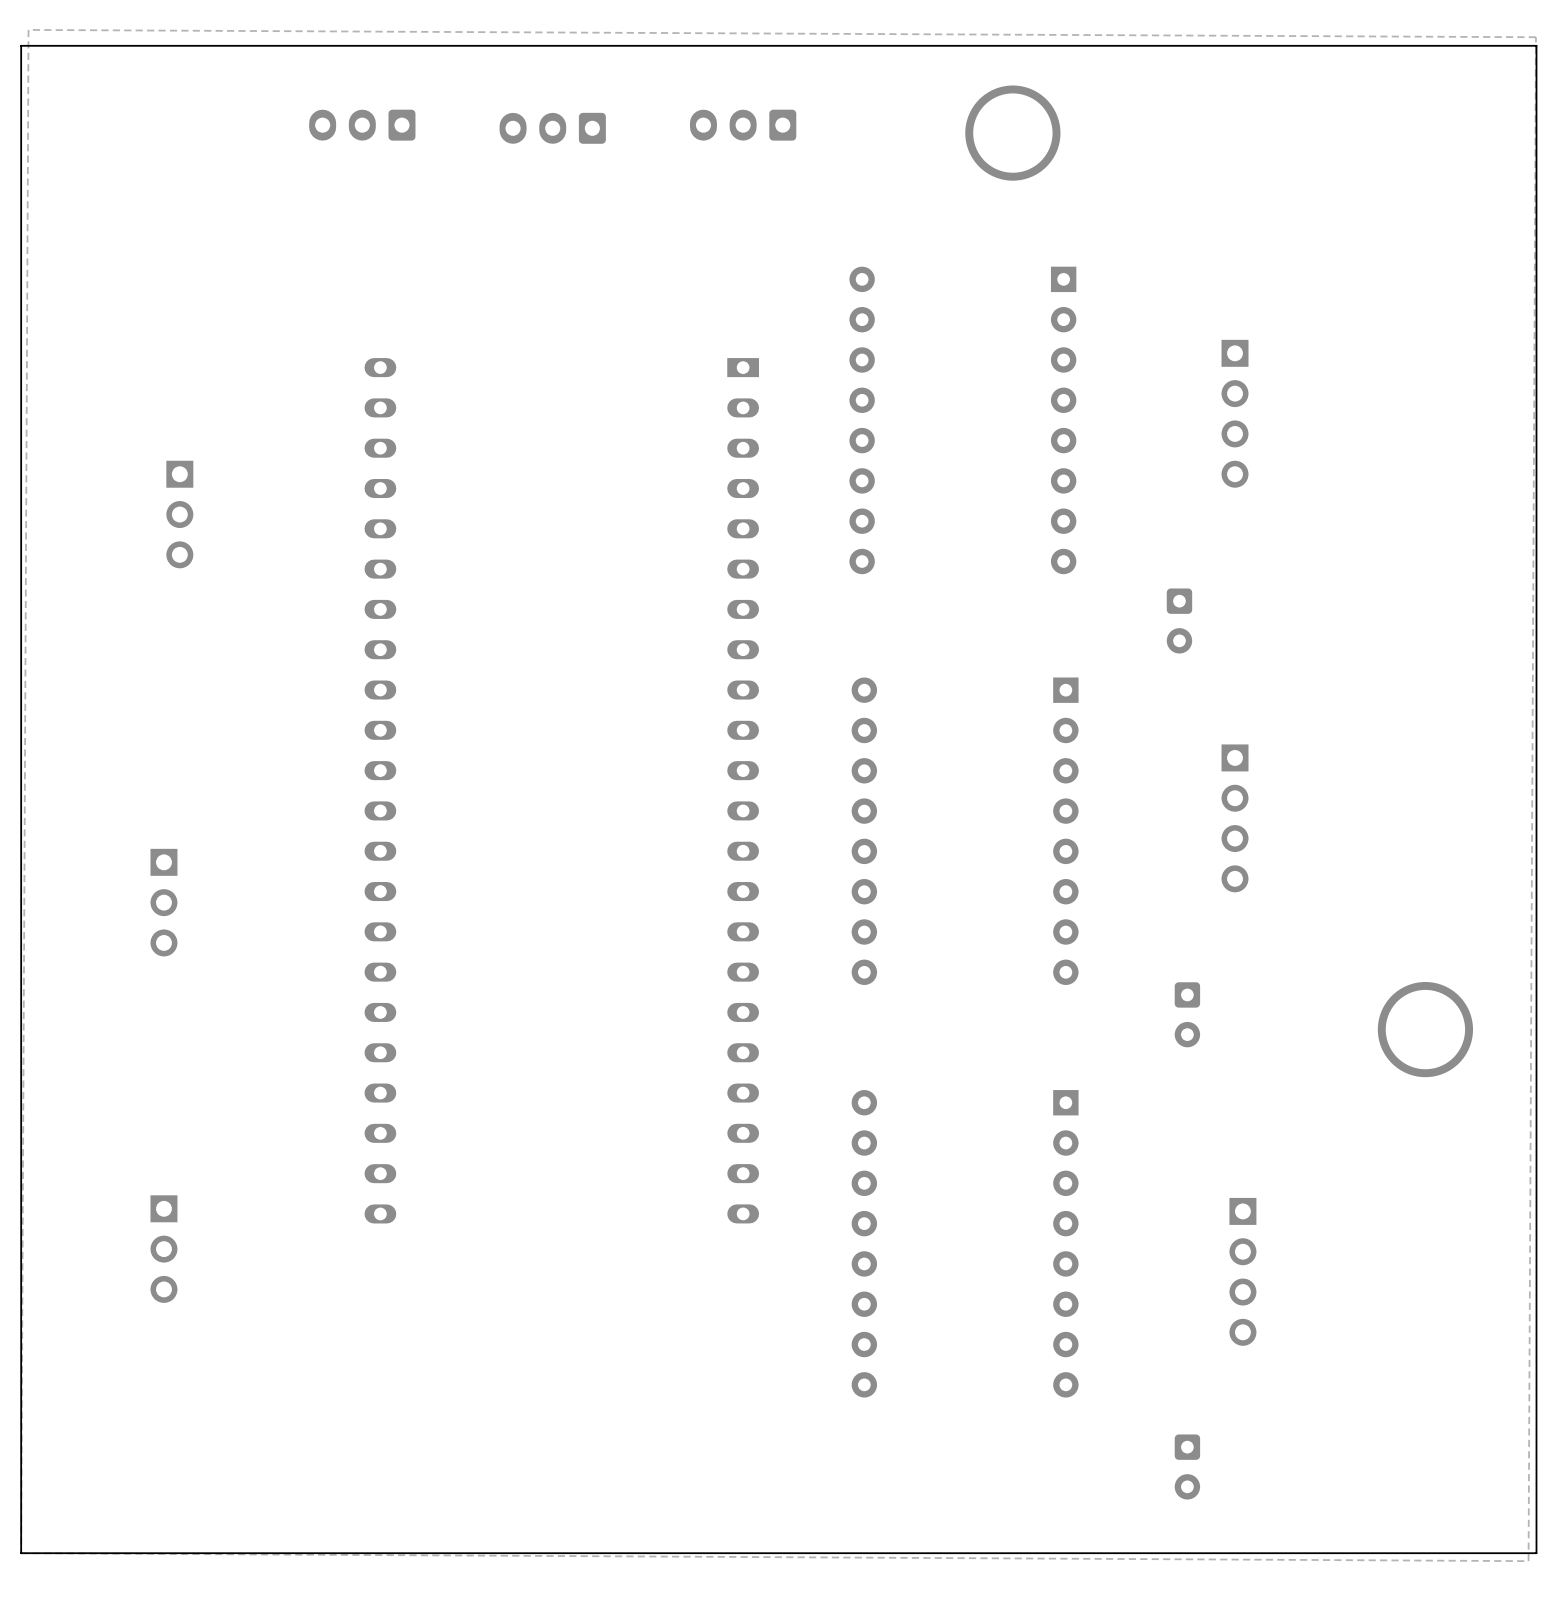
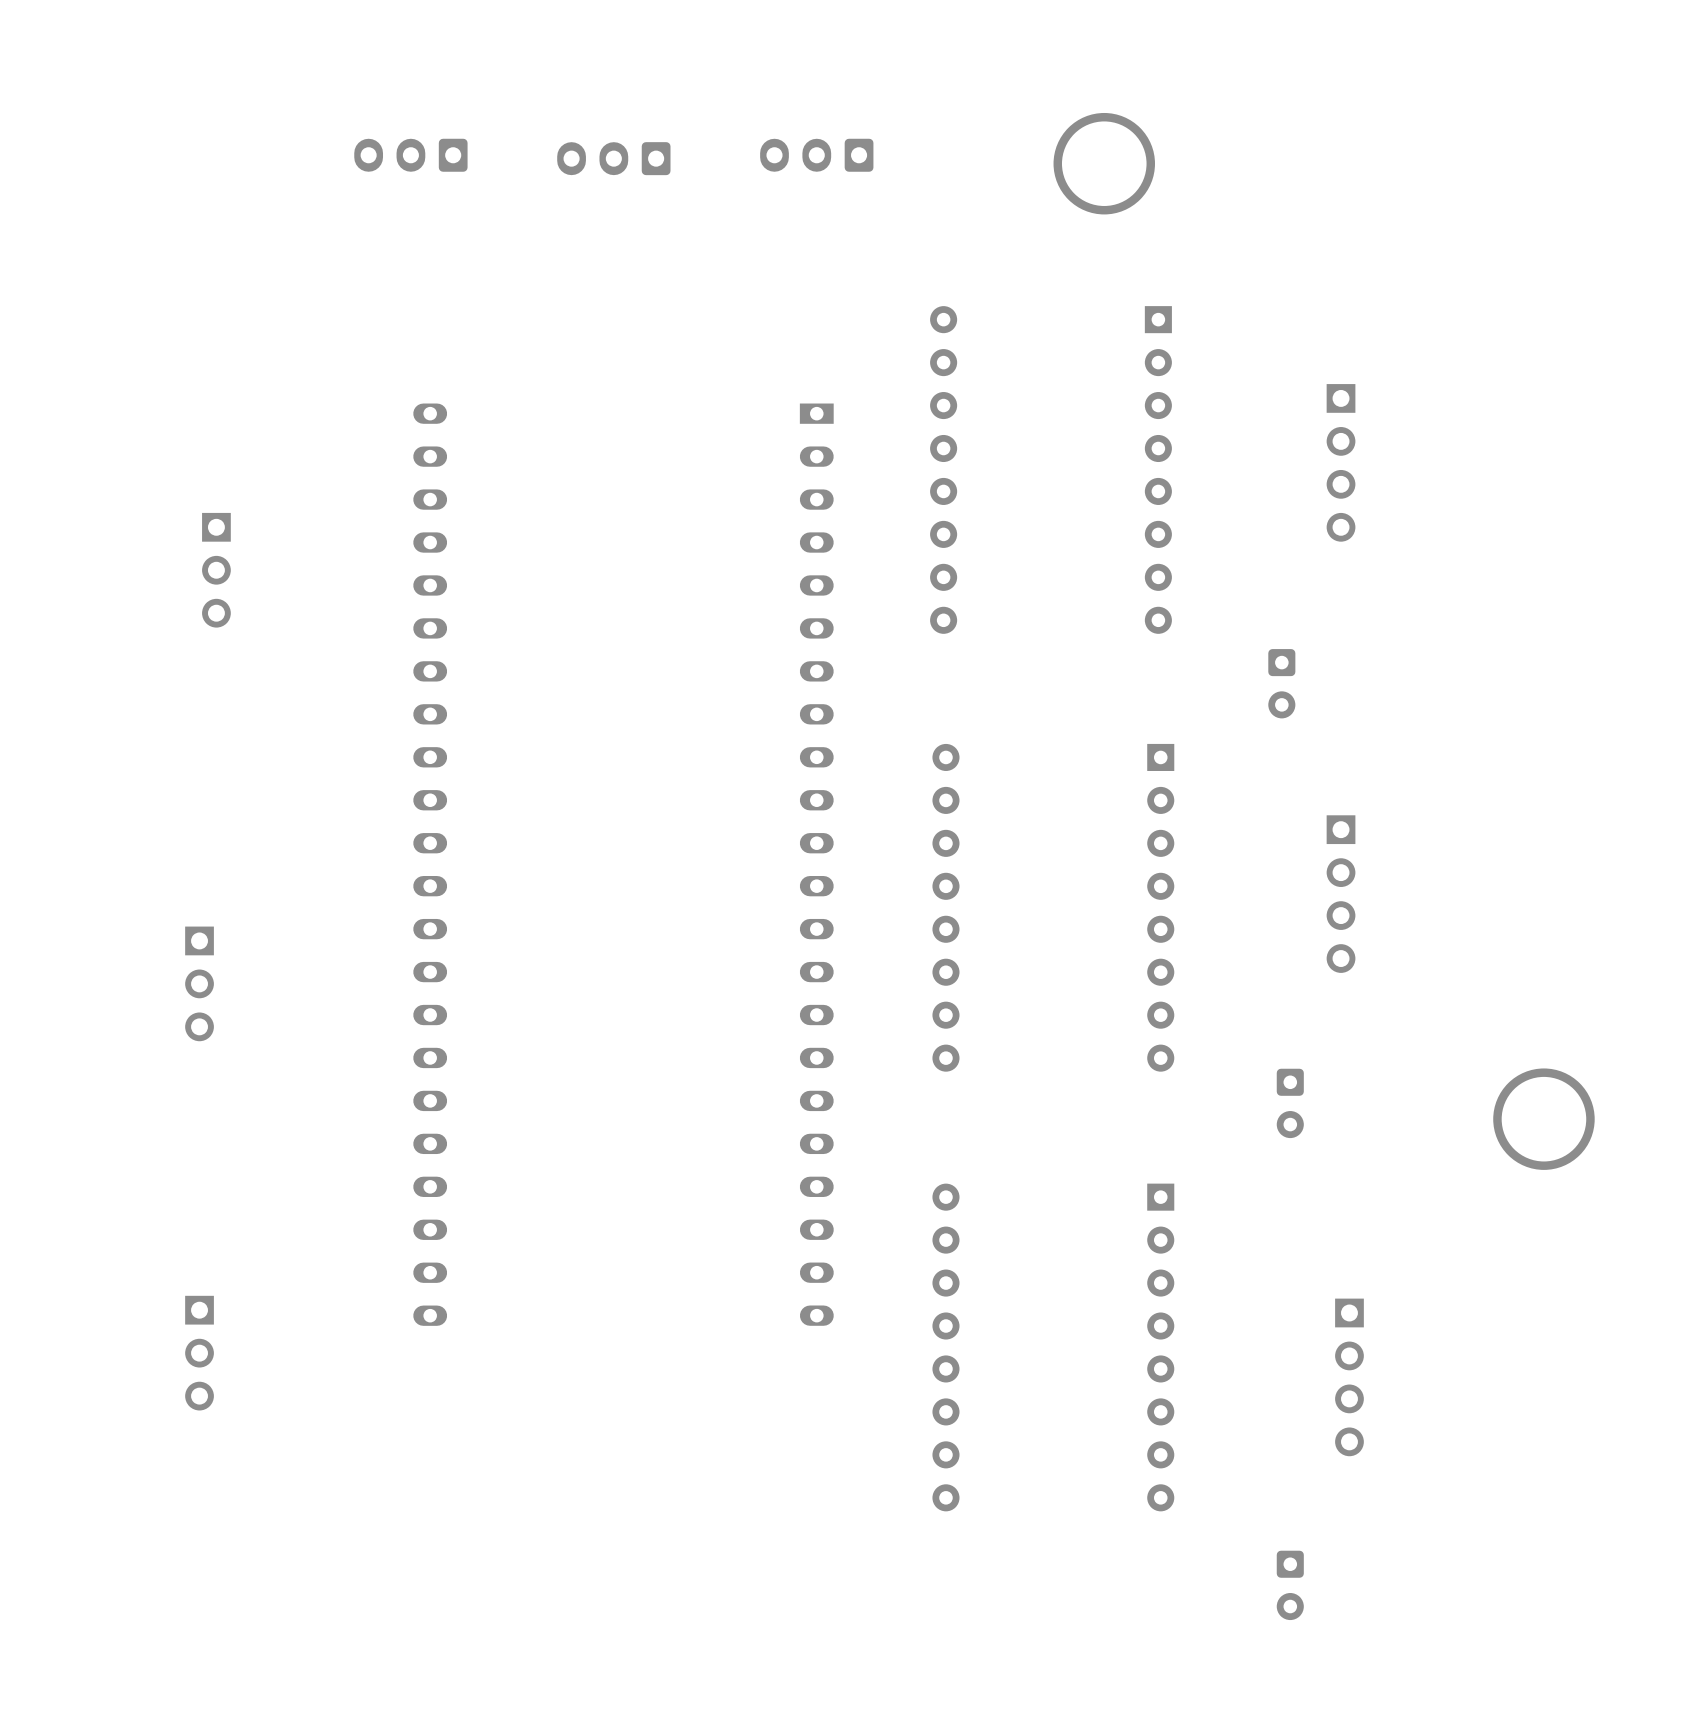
zone outline: (28, 29) (21, 1553) (1528, 1561) (1535, 37) (28, 29) -> none
board edge: (1536, 45) (21, 45) (21, 1553) (1536, 1553) (1536, 45) -> none

